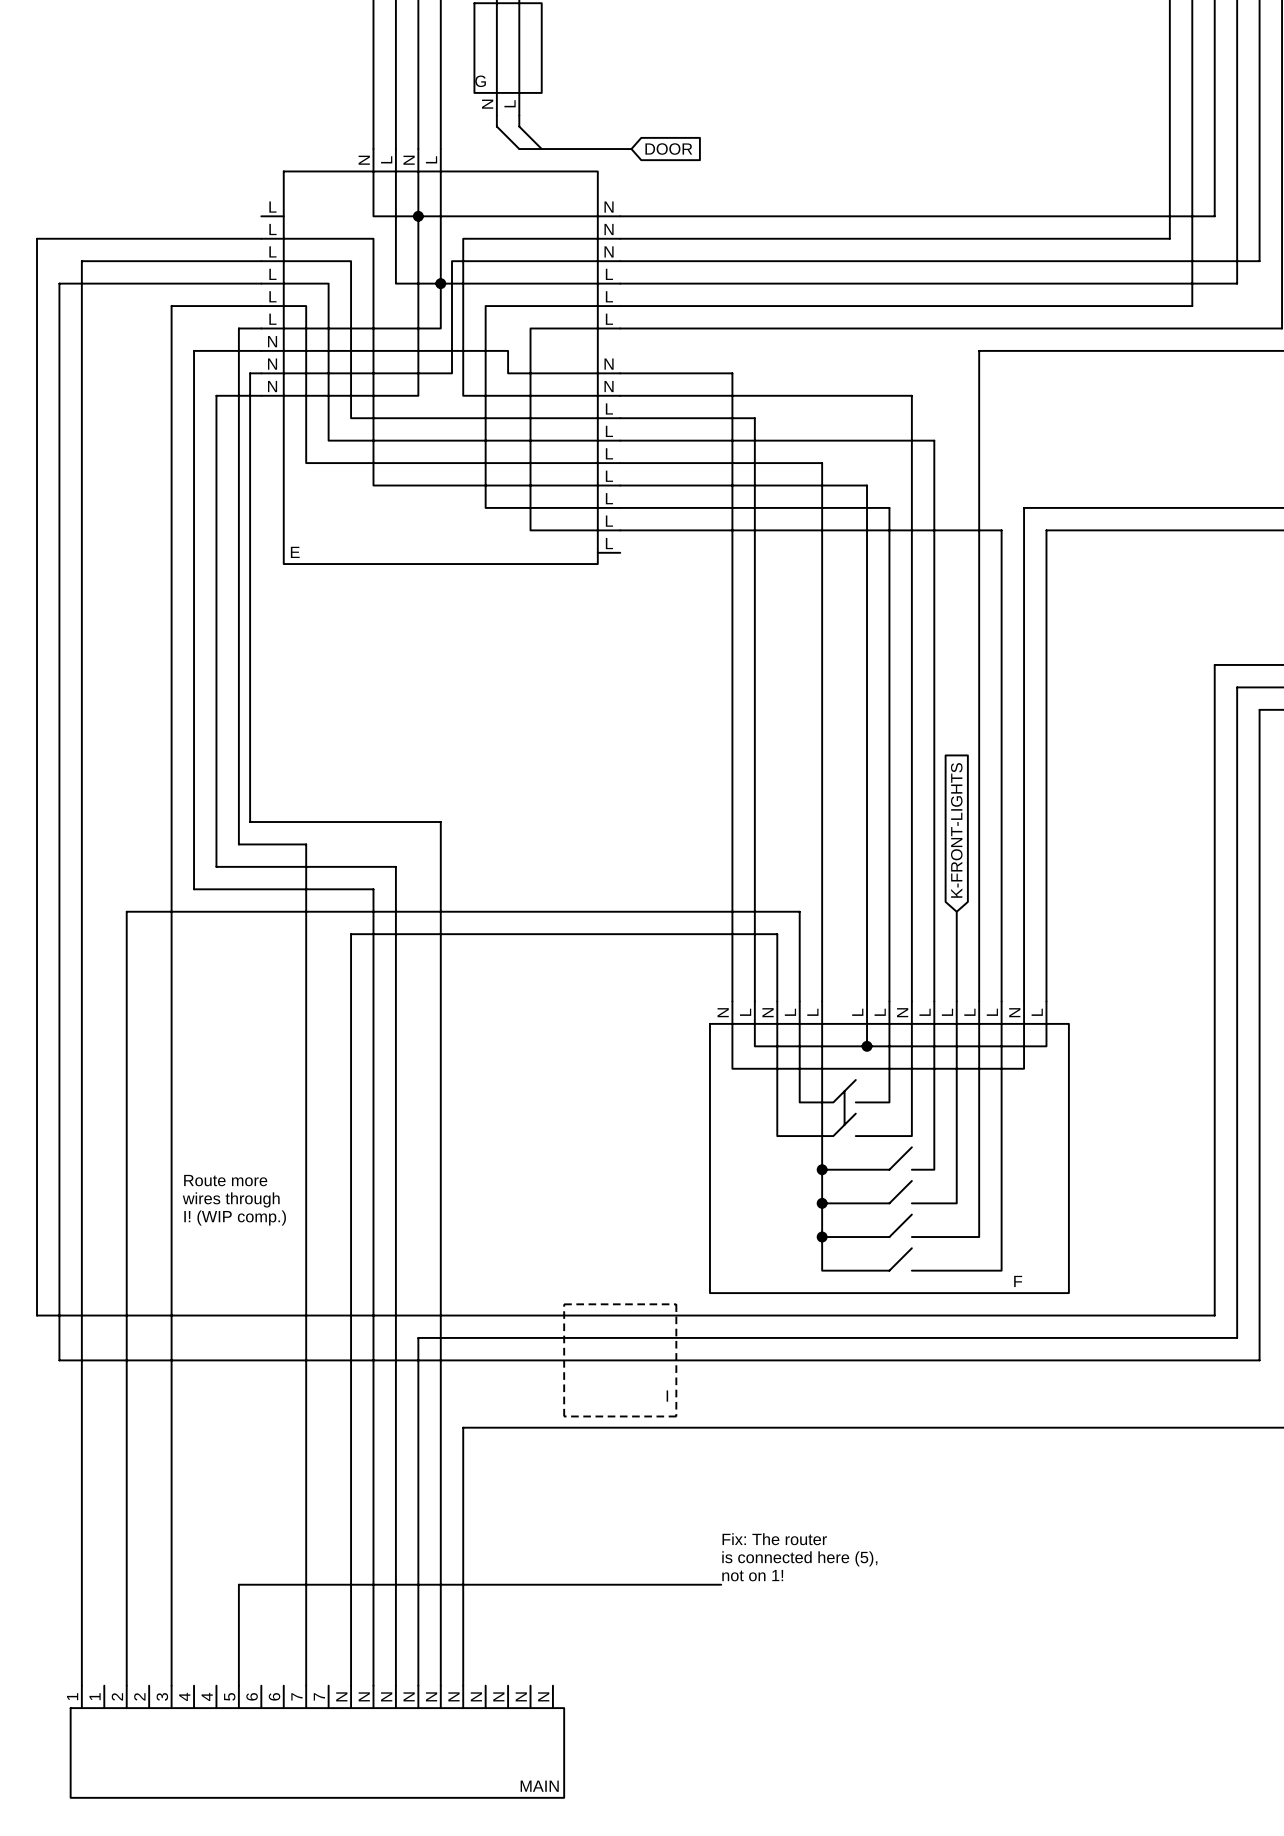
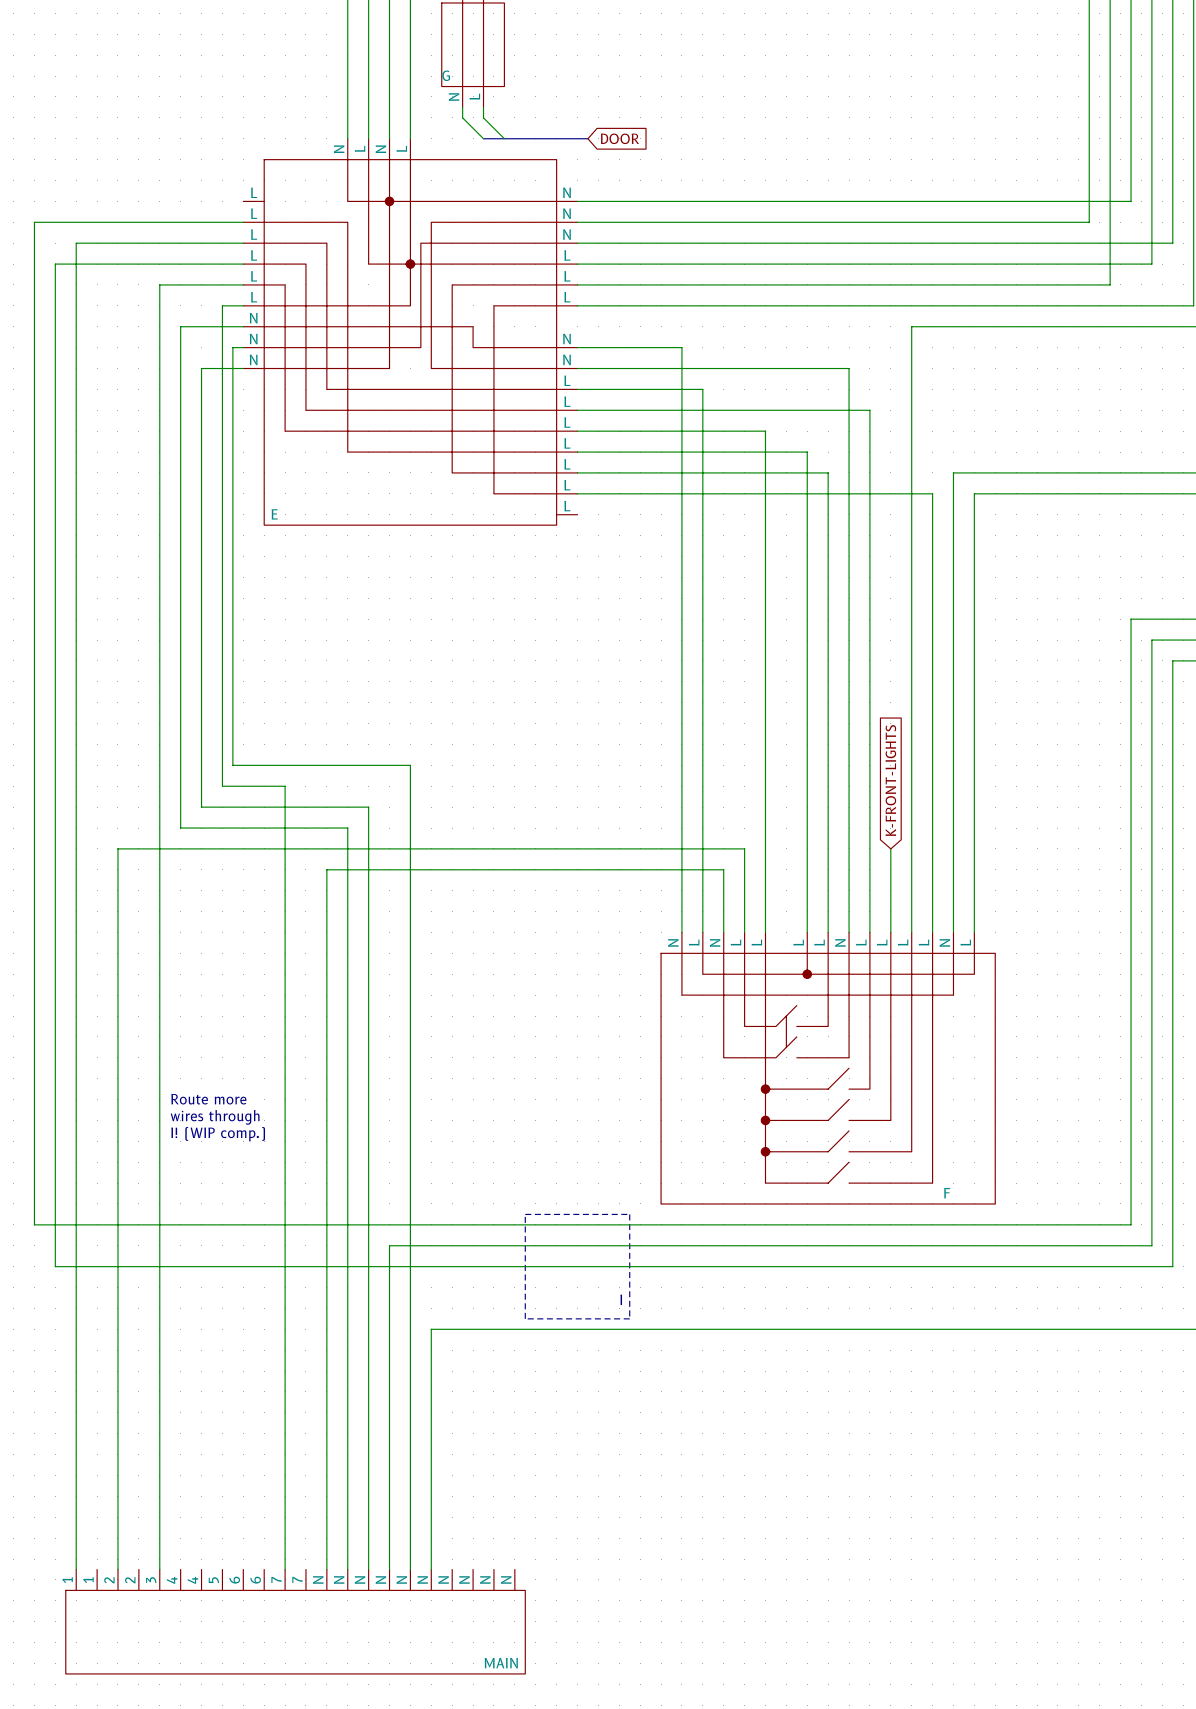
text: Fix: The router (774, 1539) -> none
text: is connected here (5), (799, 1558) -> none
text: not on 1! (752, 1575) -> none
wire: (721, 1584) (238, 1584) (238, 1685) -> none

